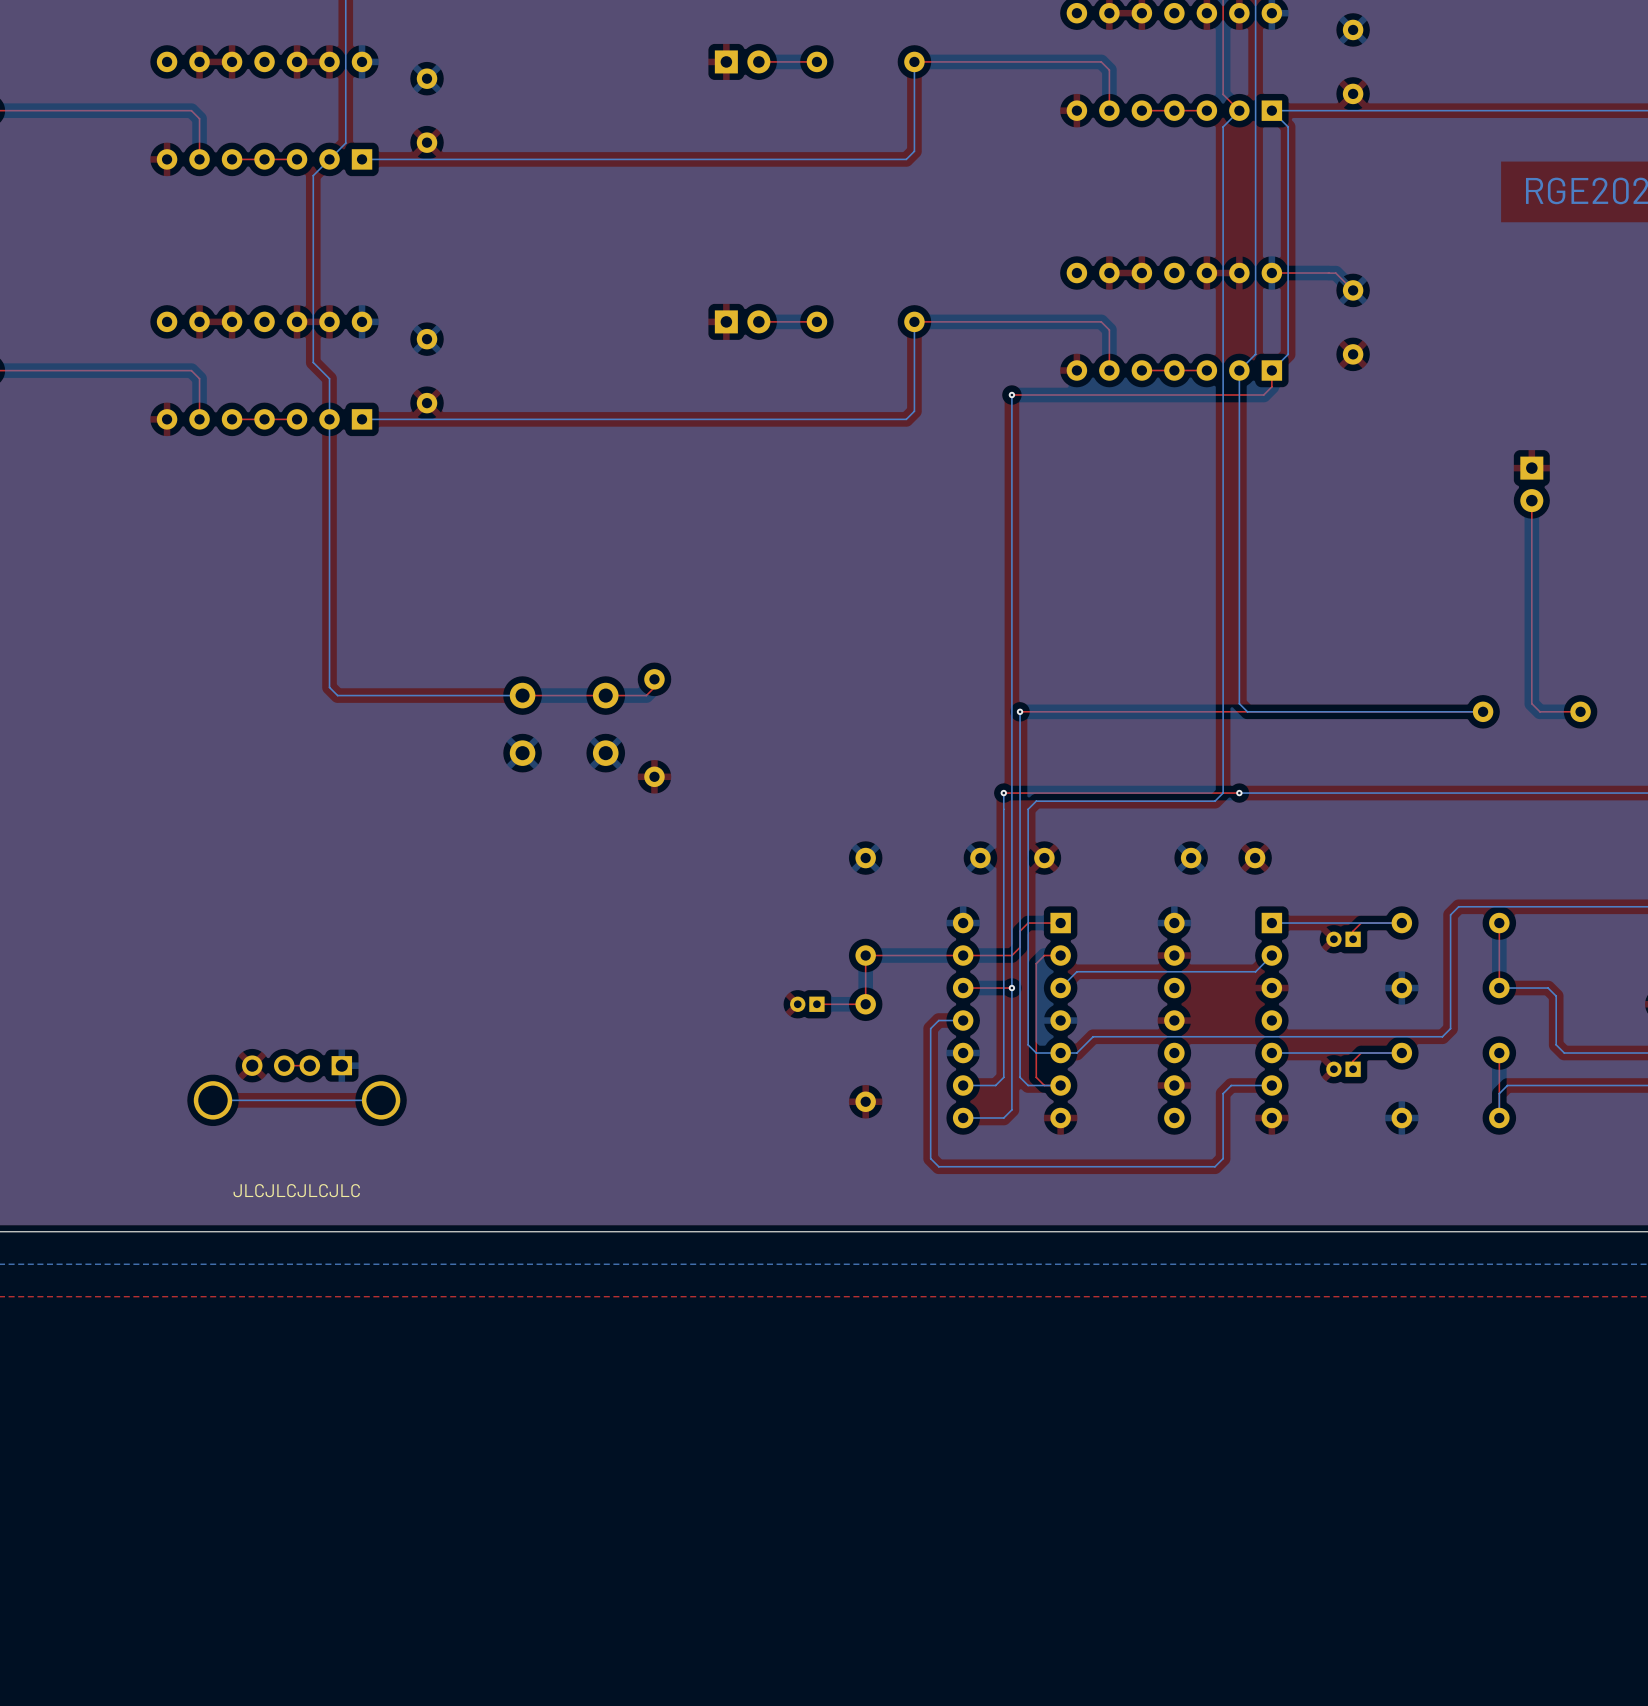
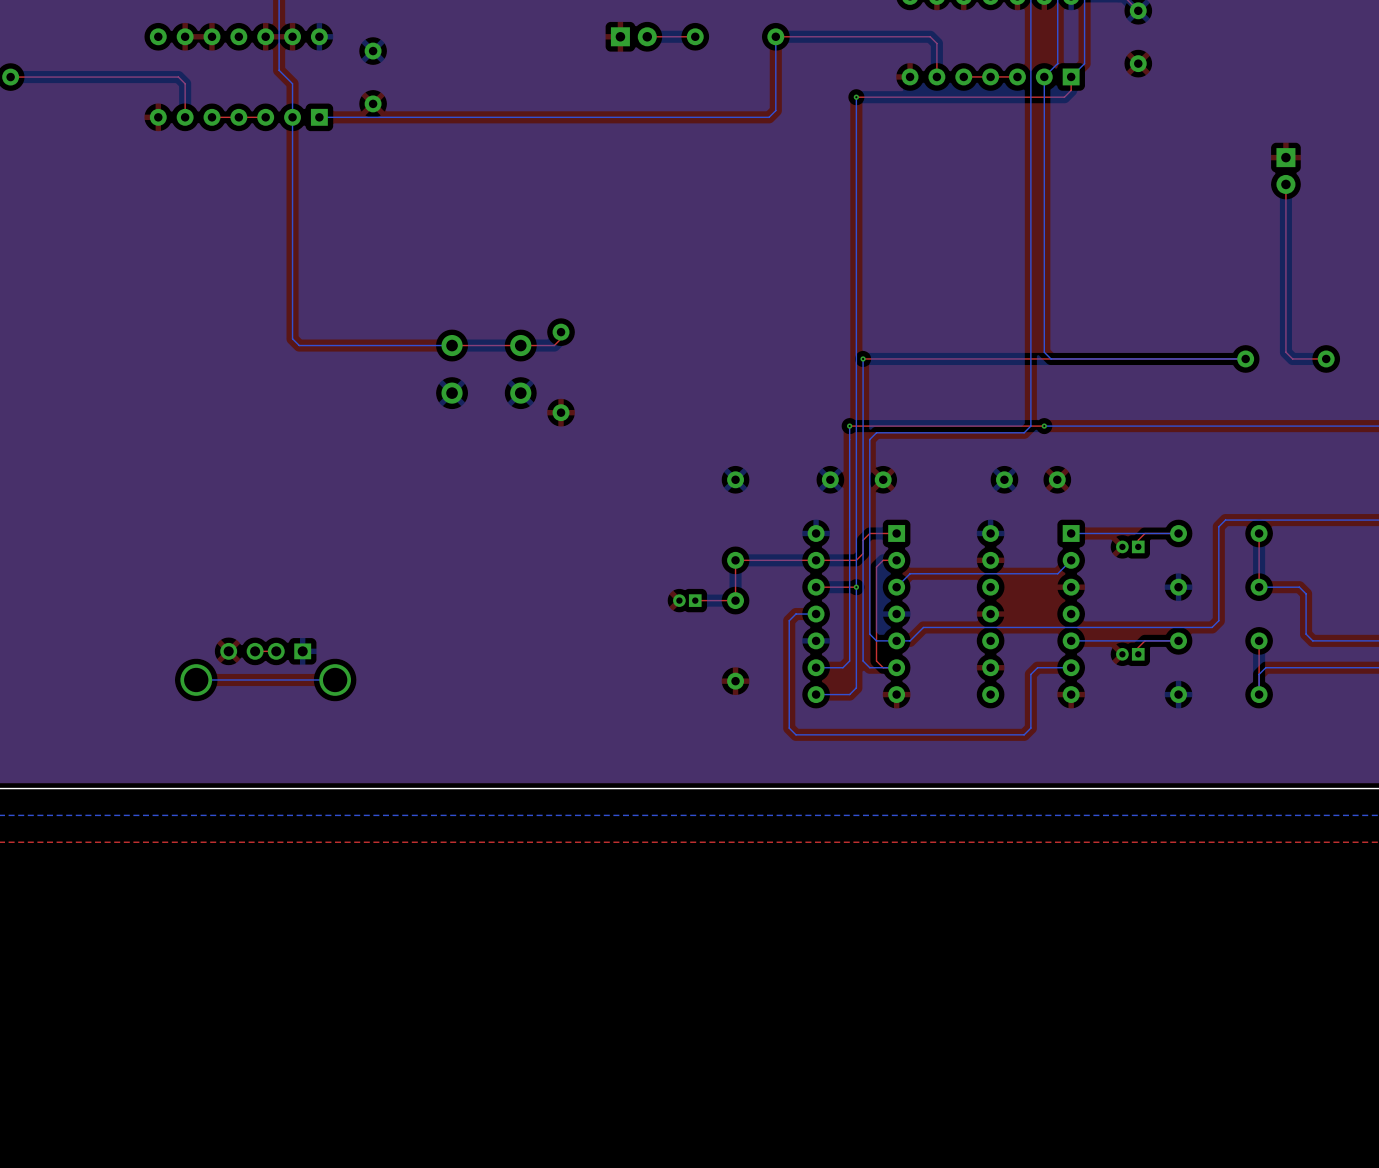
text: JLCJLCJLCJLC (296, 1190) -> none

